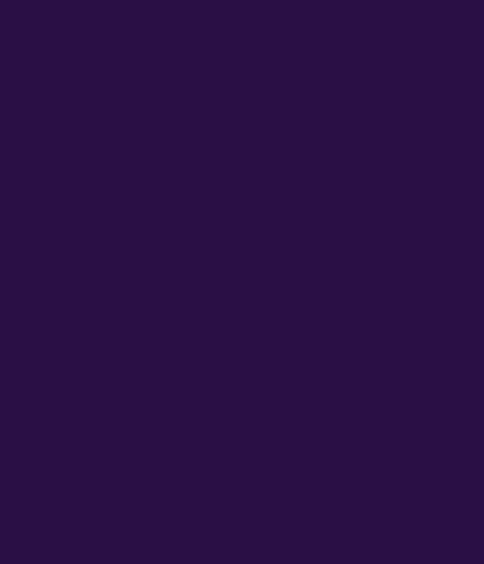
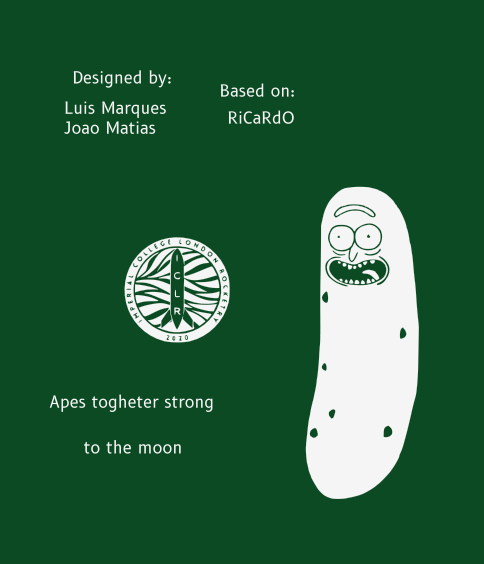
text: none -> Designed by: (122, 78)
text: none -> Based on: (257, 90)
text: none -> Luis Marques (115, 109)
text: none -> RiCaRdO (261, 117)
text: none -> Joao Matias (109, 127)
drawing: none -> [305, 186, 419, 499]
drawing: none -> [124, 237, 230, 343]
text: none -> Apes togheter strong (131, 403)
text: none -> to the moon (132, 446)

